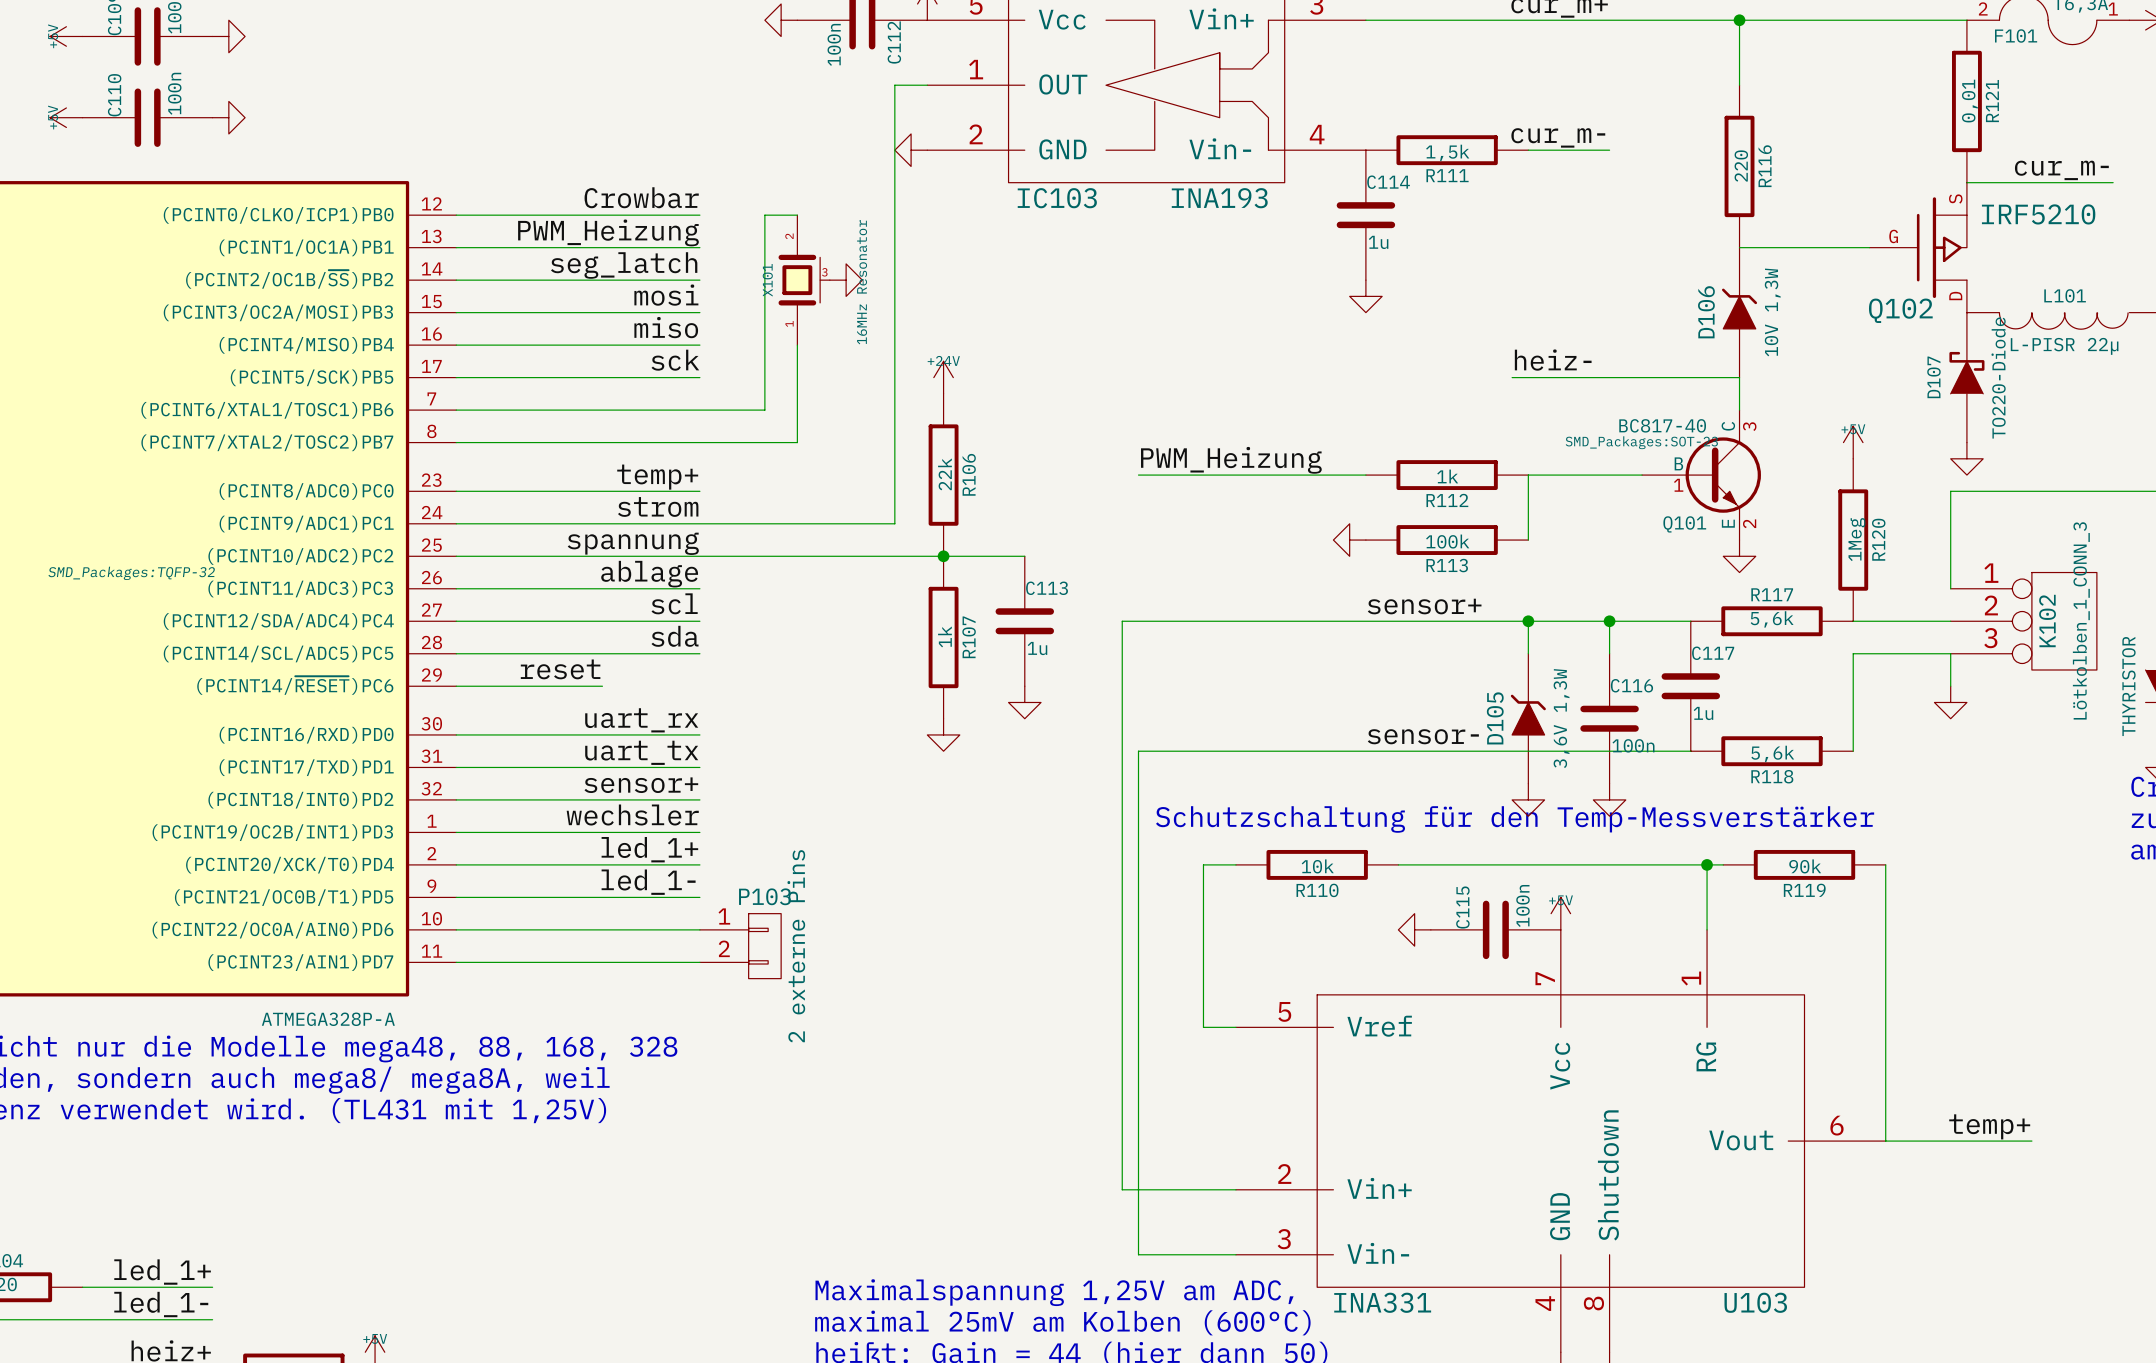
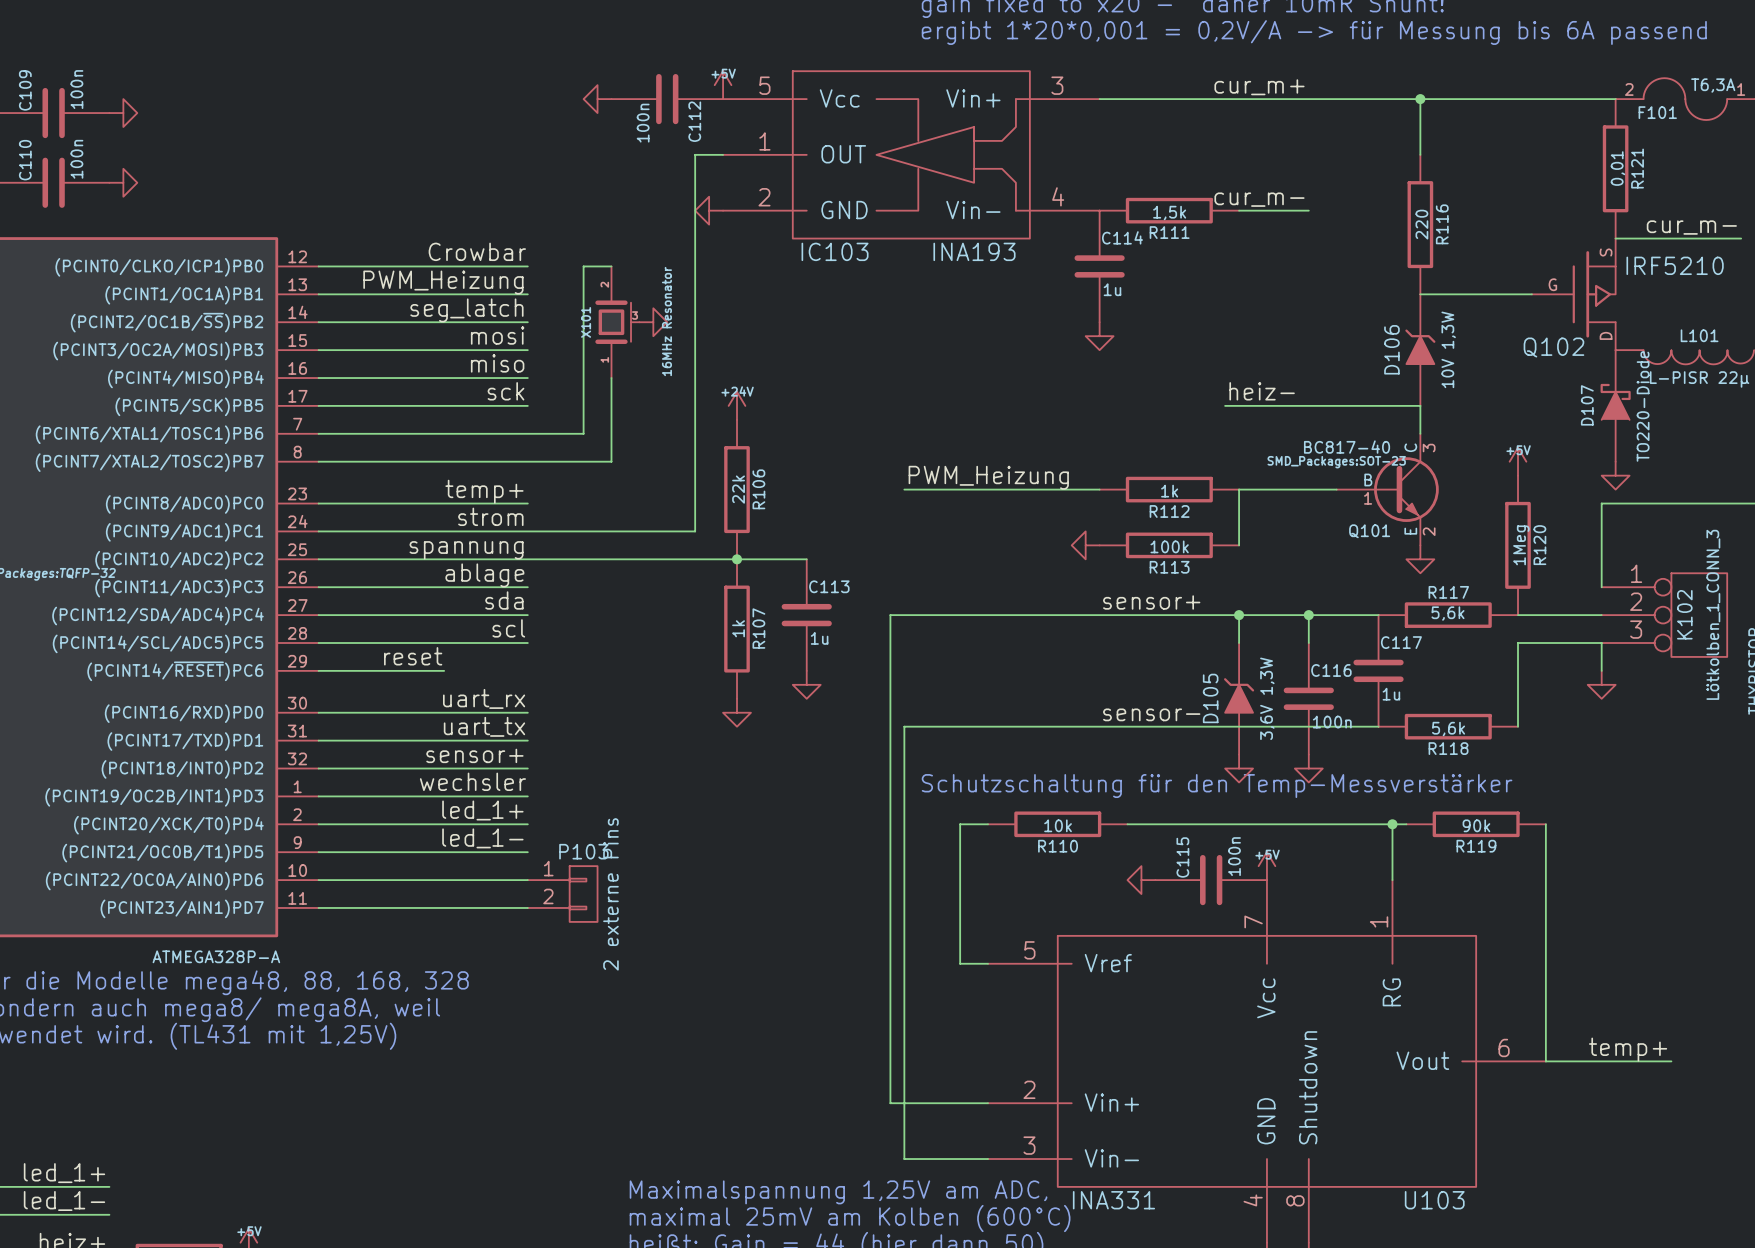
label: scl (674, 603) -> sda (504, 600)
label: sda (675, 636) -> scl (508, 628)

